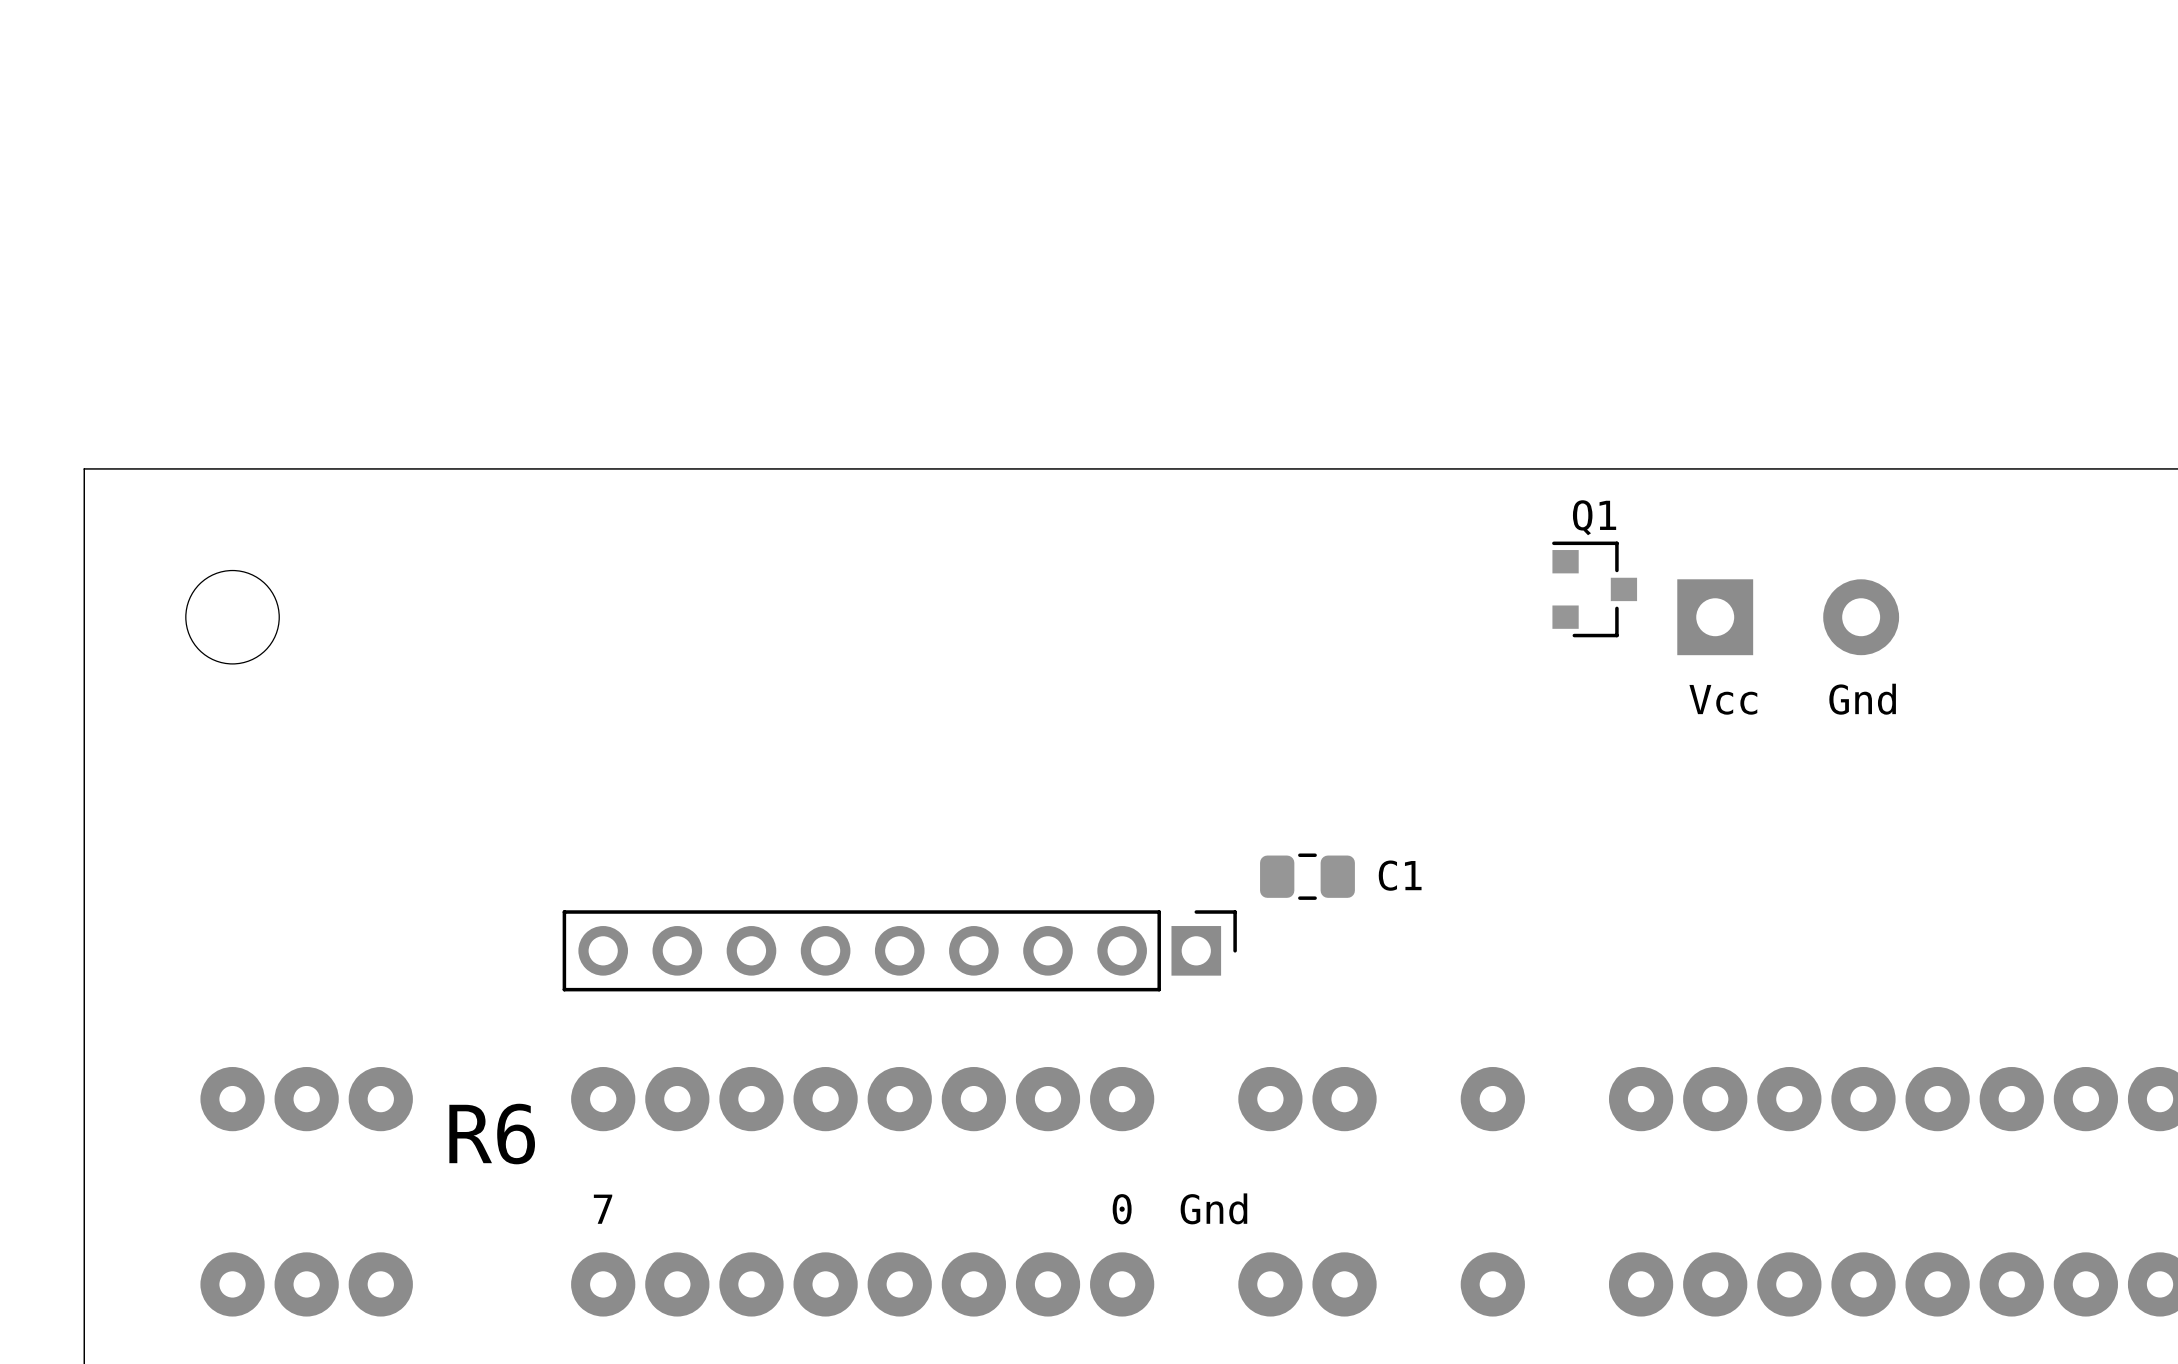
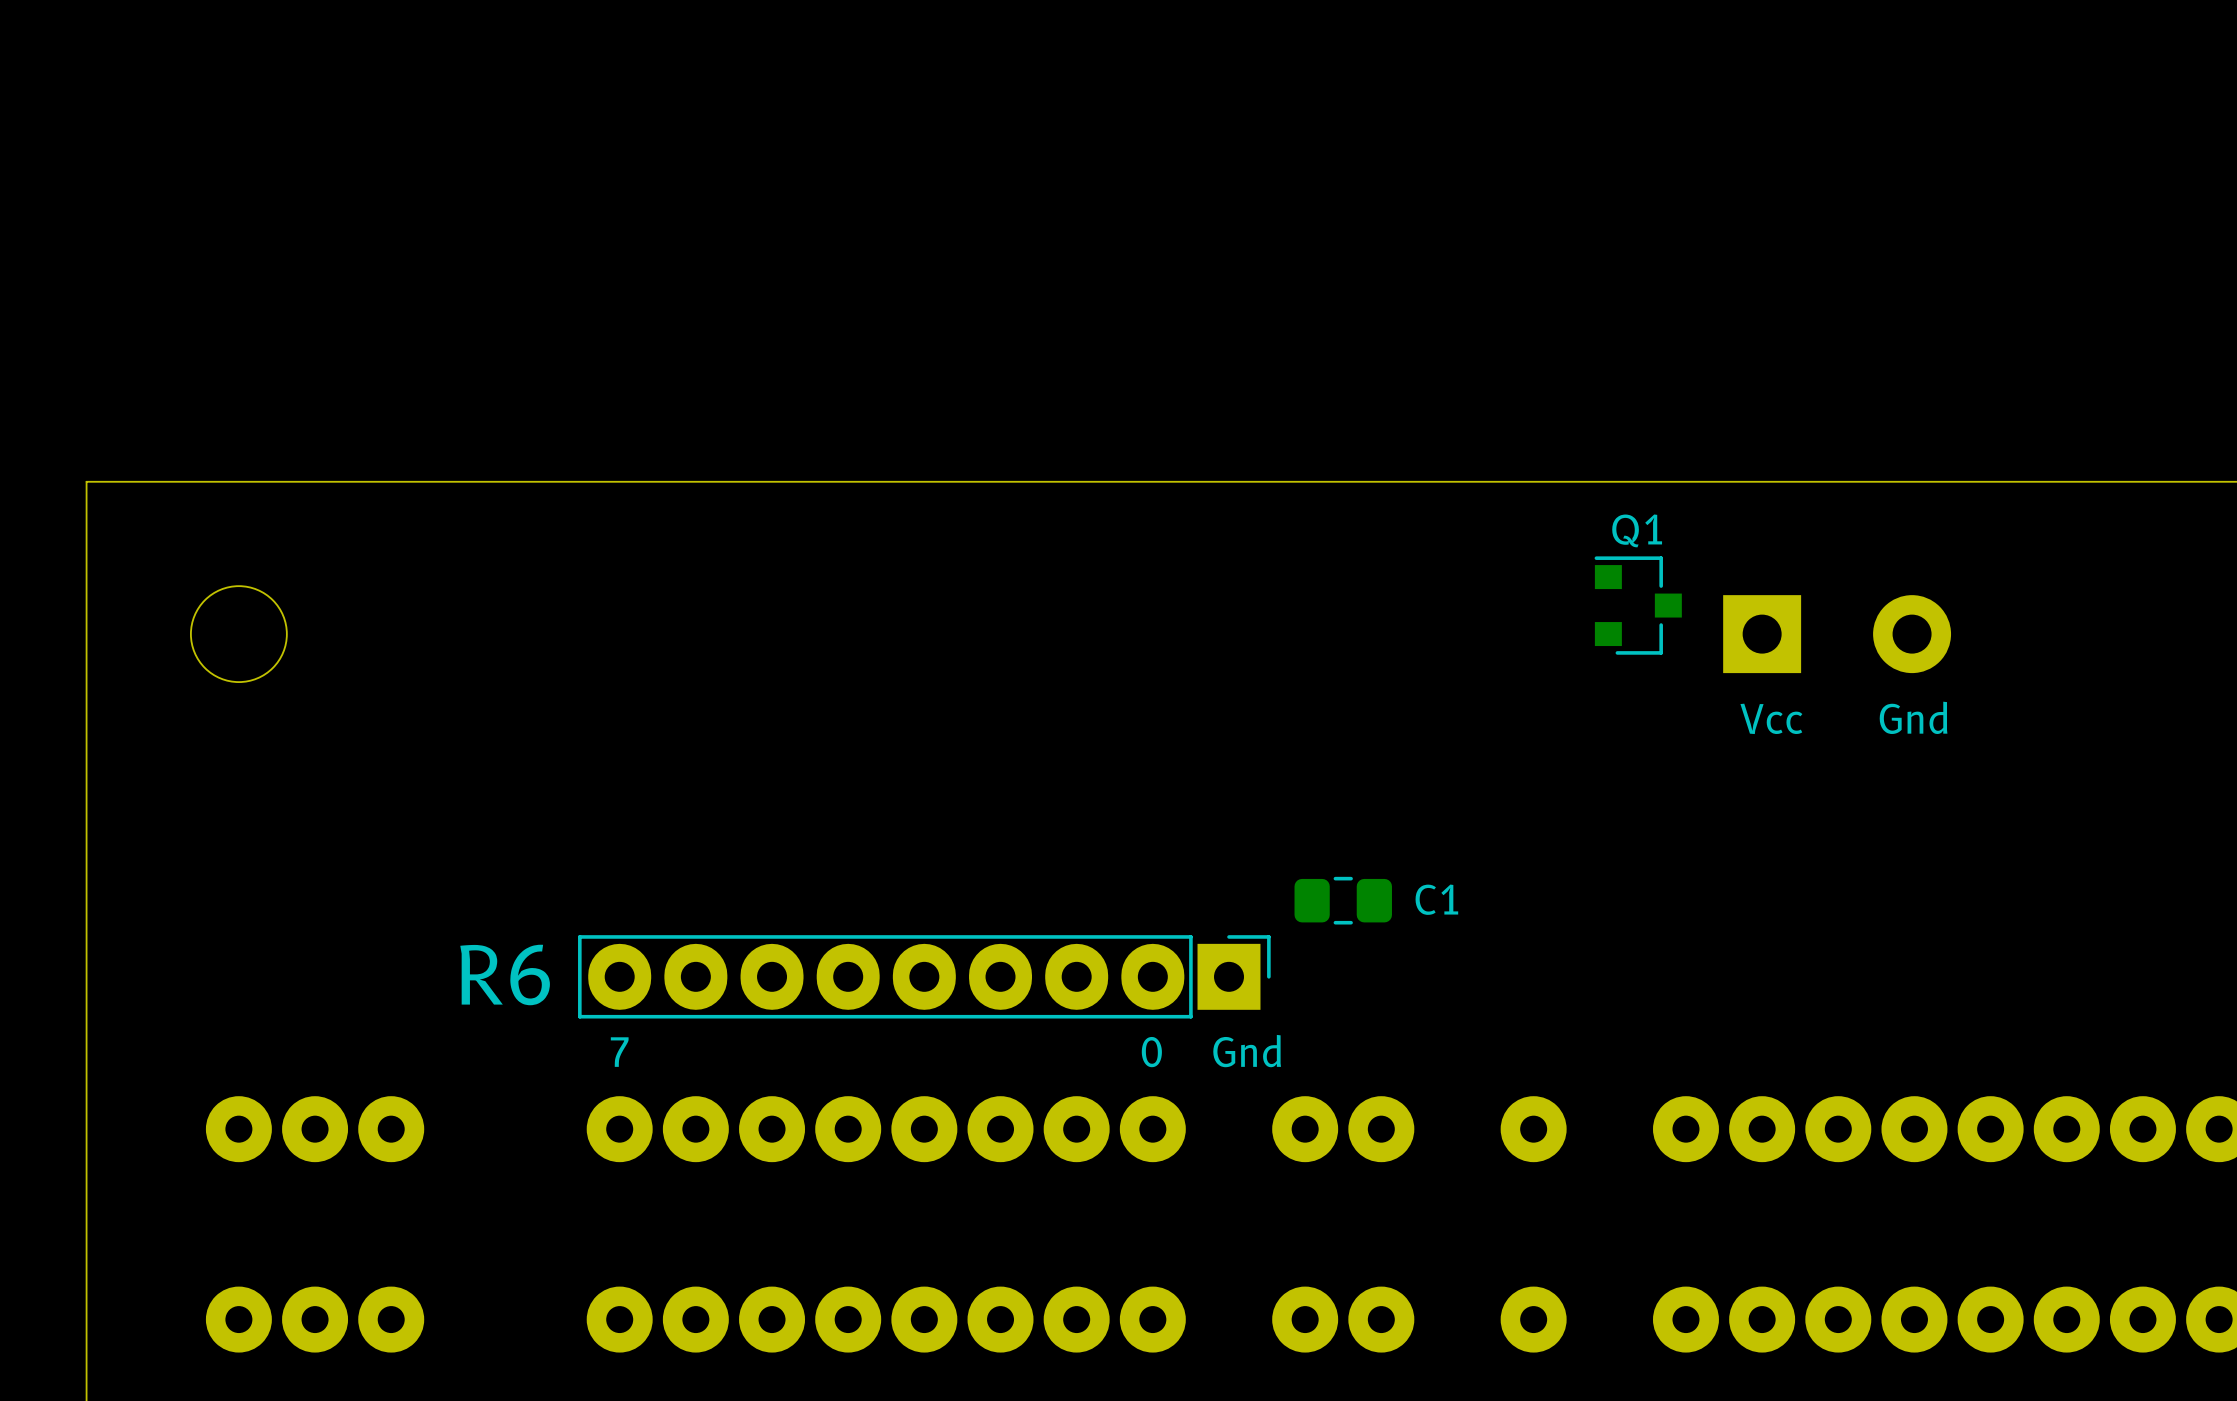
part footprint: [562, 910, 1237, 992] -> [578, 935, 1271, 1019]
text position: R6 (492, 1134) -> R6 (505, 974)
text position: Gnd (1213, 1208) -> Gnd (1247, 1051)
text position: 7 (603, 1209) -> 7 (619, 1052)
text position: 0 (1122, 1209) -> 0 (1151, 1052)

